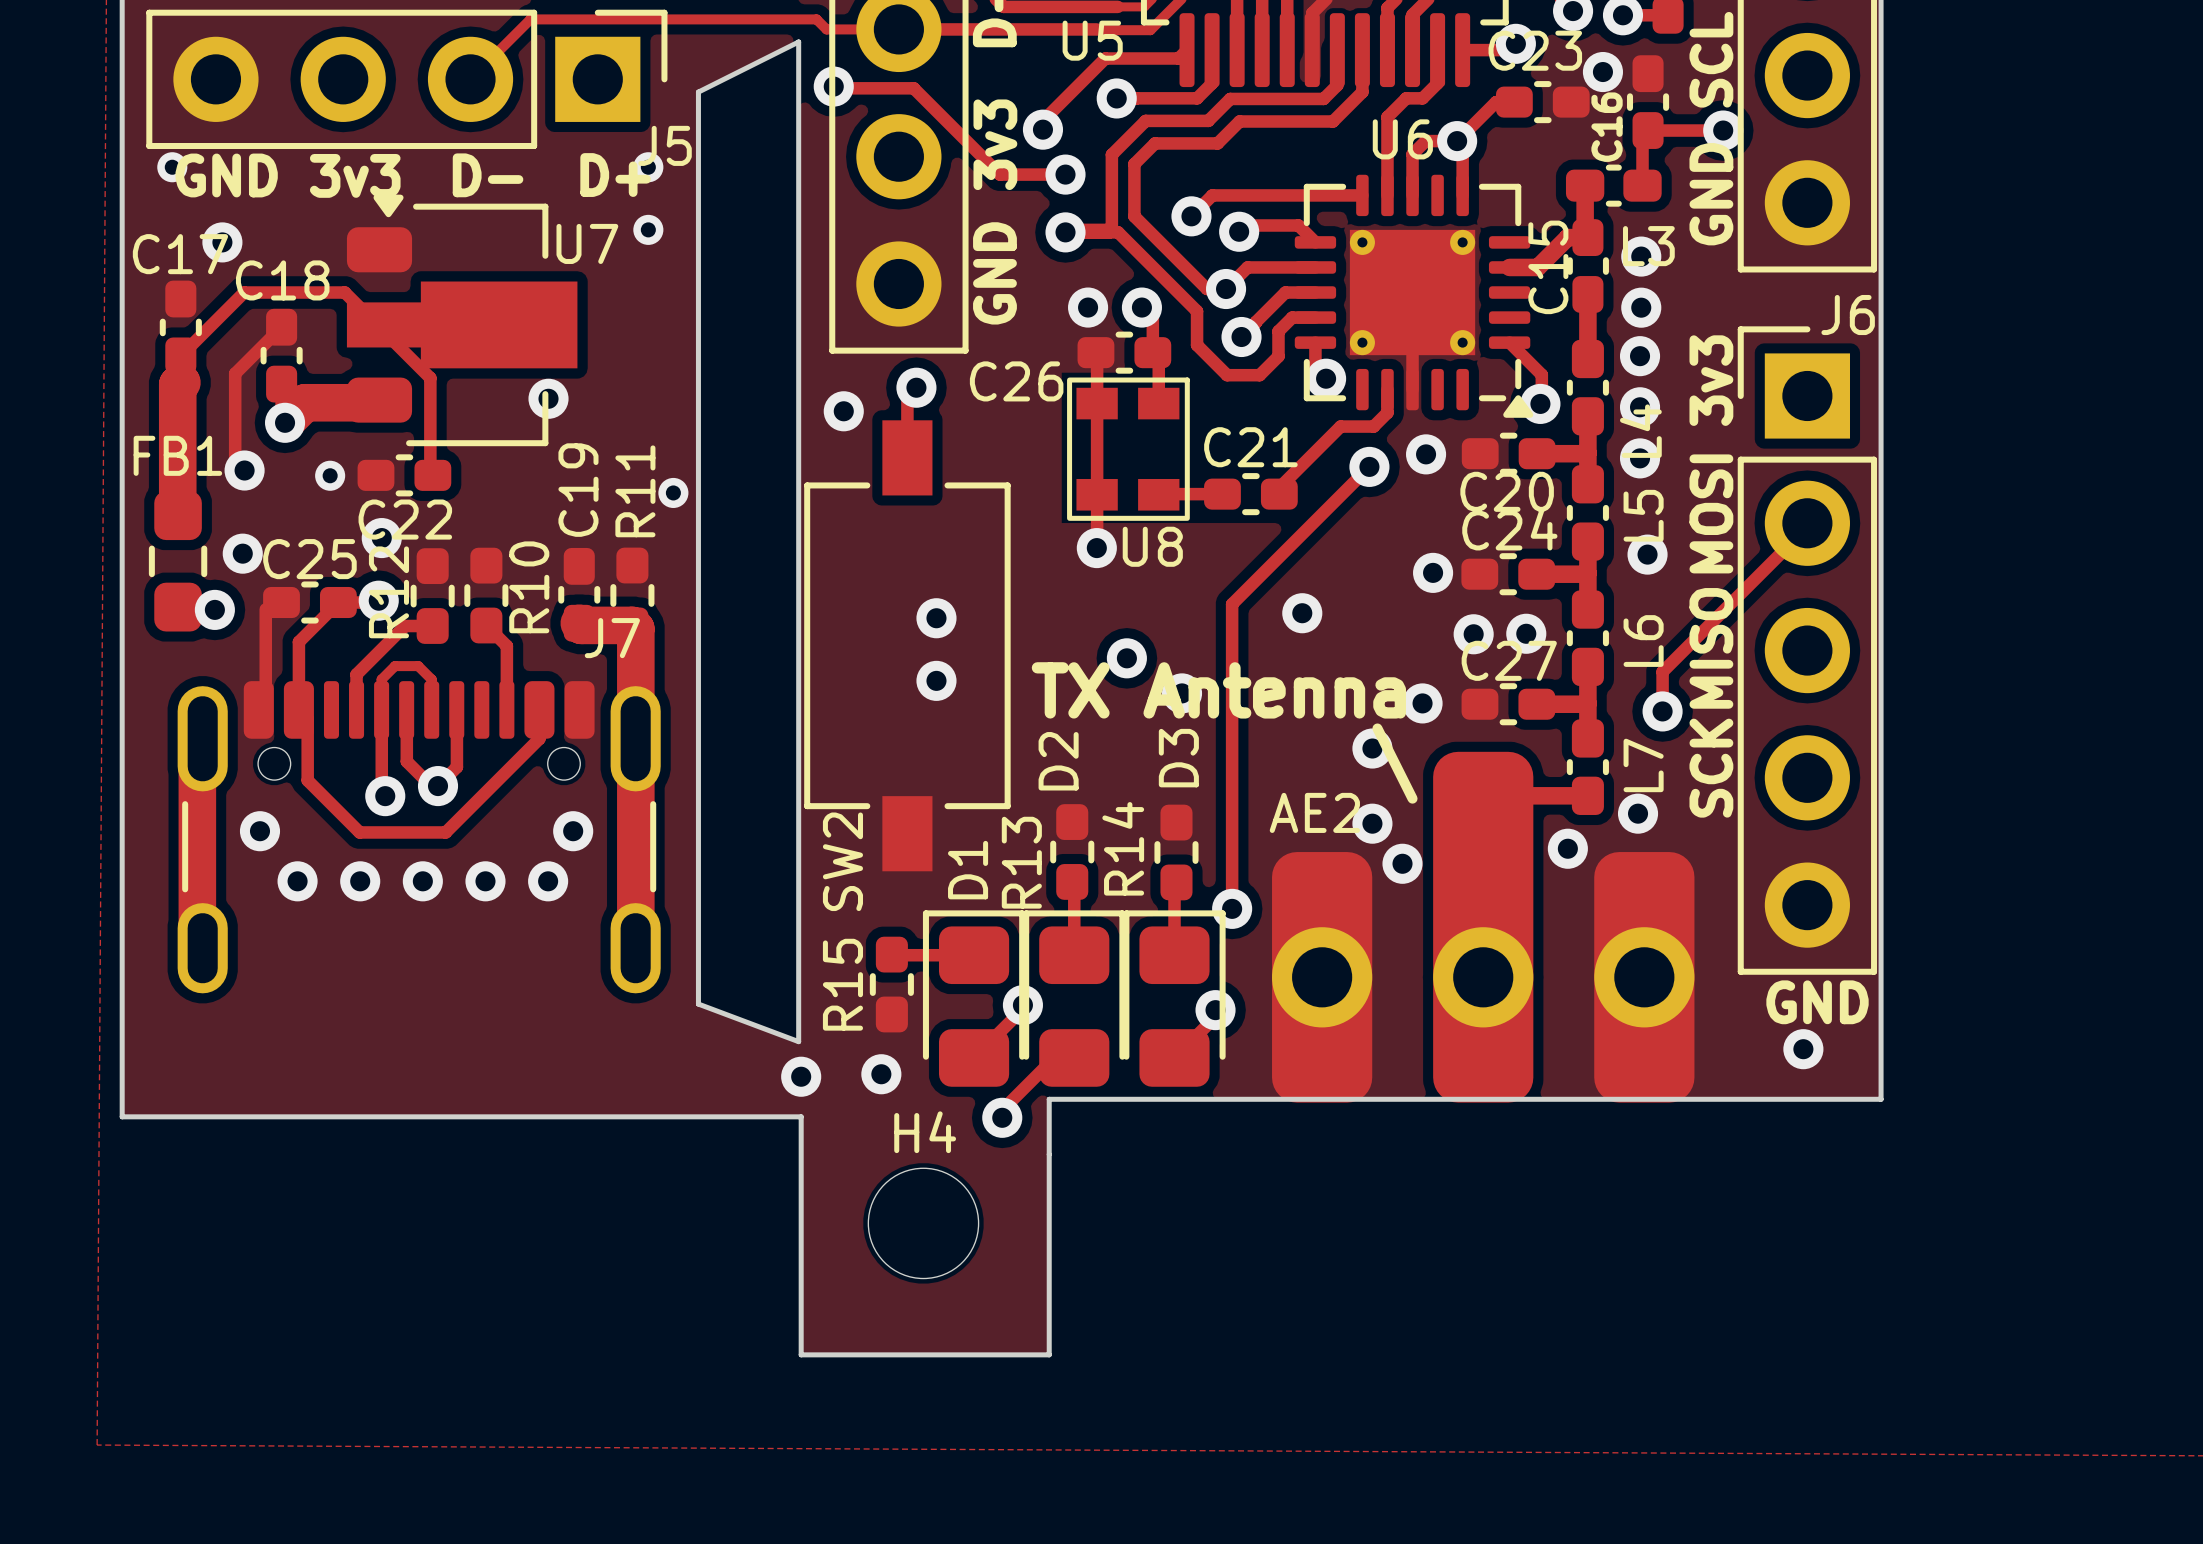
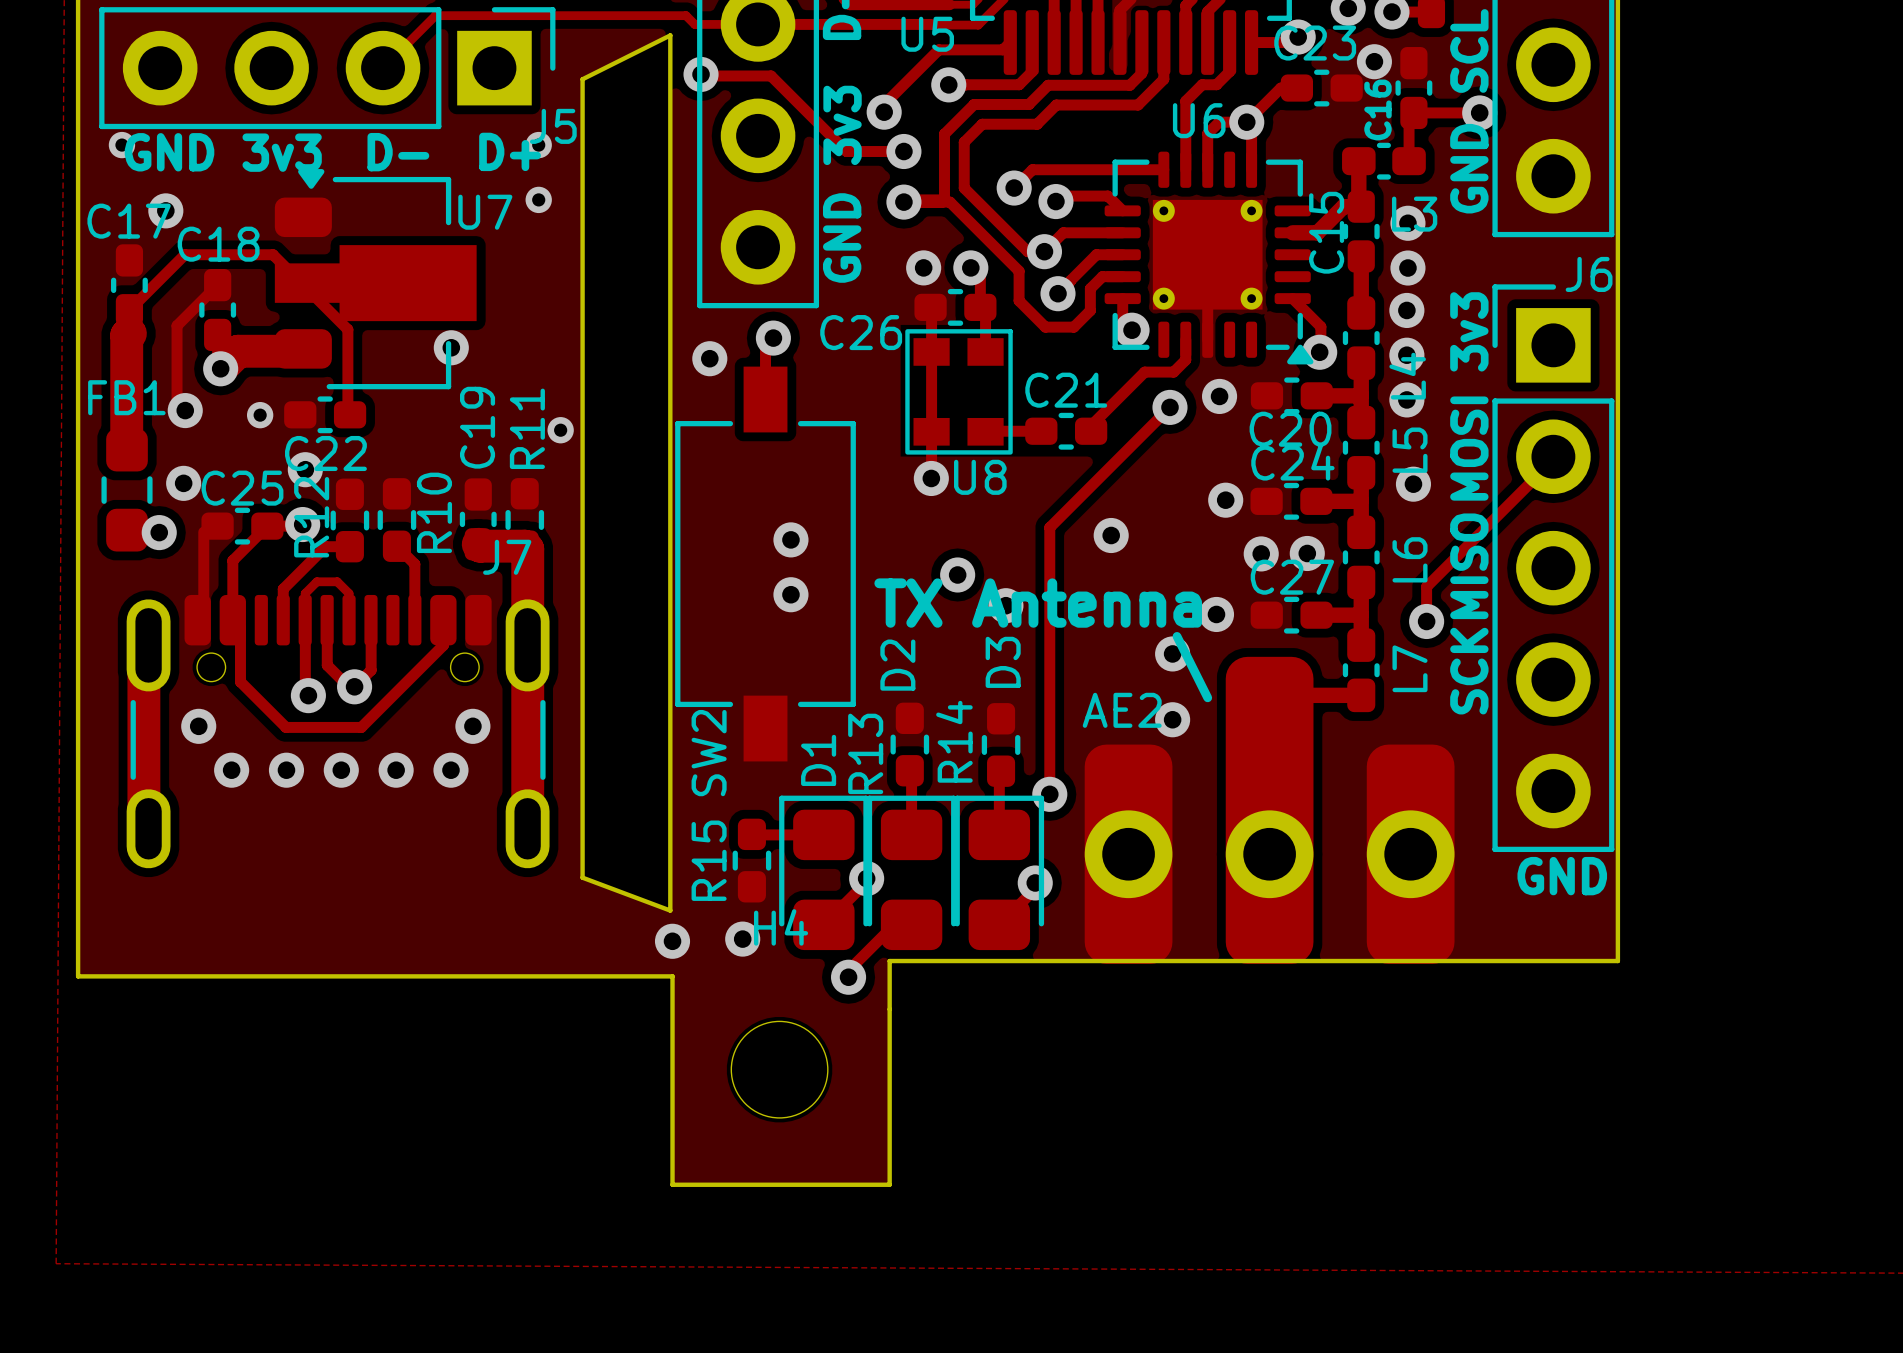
via: (1638, 813) -> none
via: (1567, 848) -> none
via: (1402, 863) -> none
via: (1803, 1049) -> none
H4 name position: H4 (925, 1132) -> H4 (781, 927)

